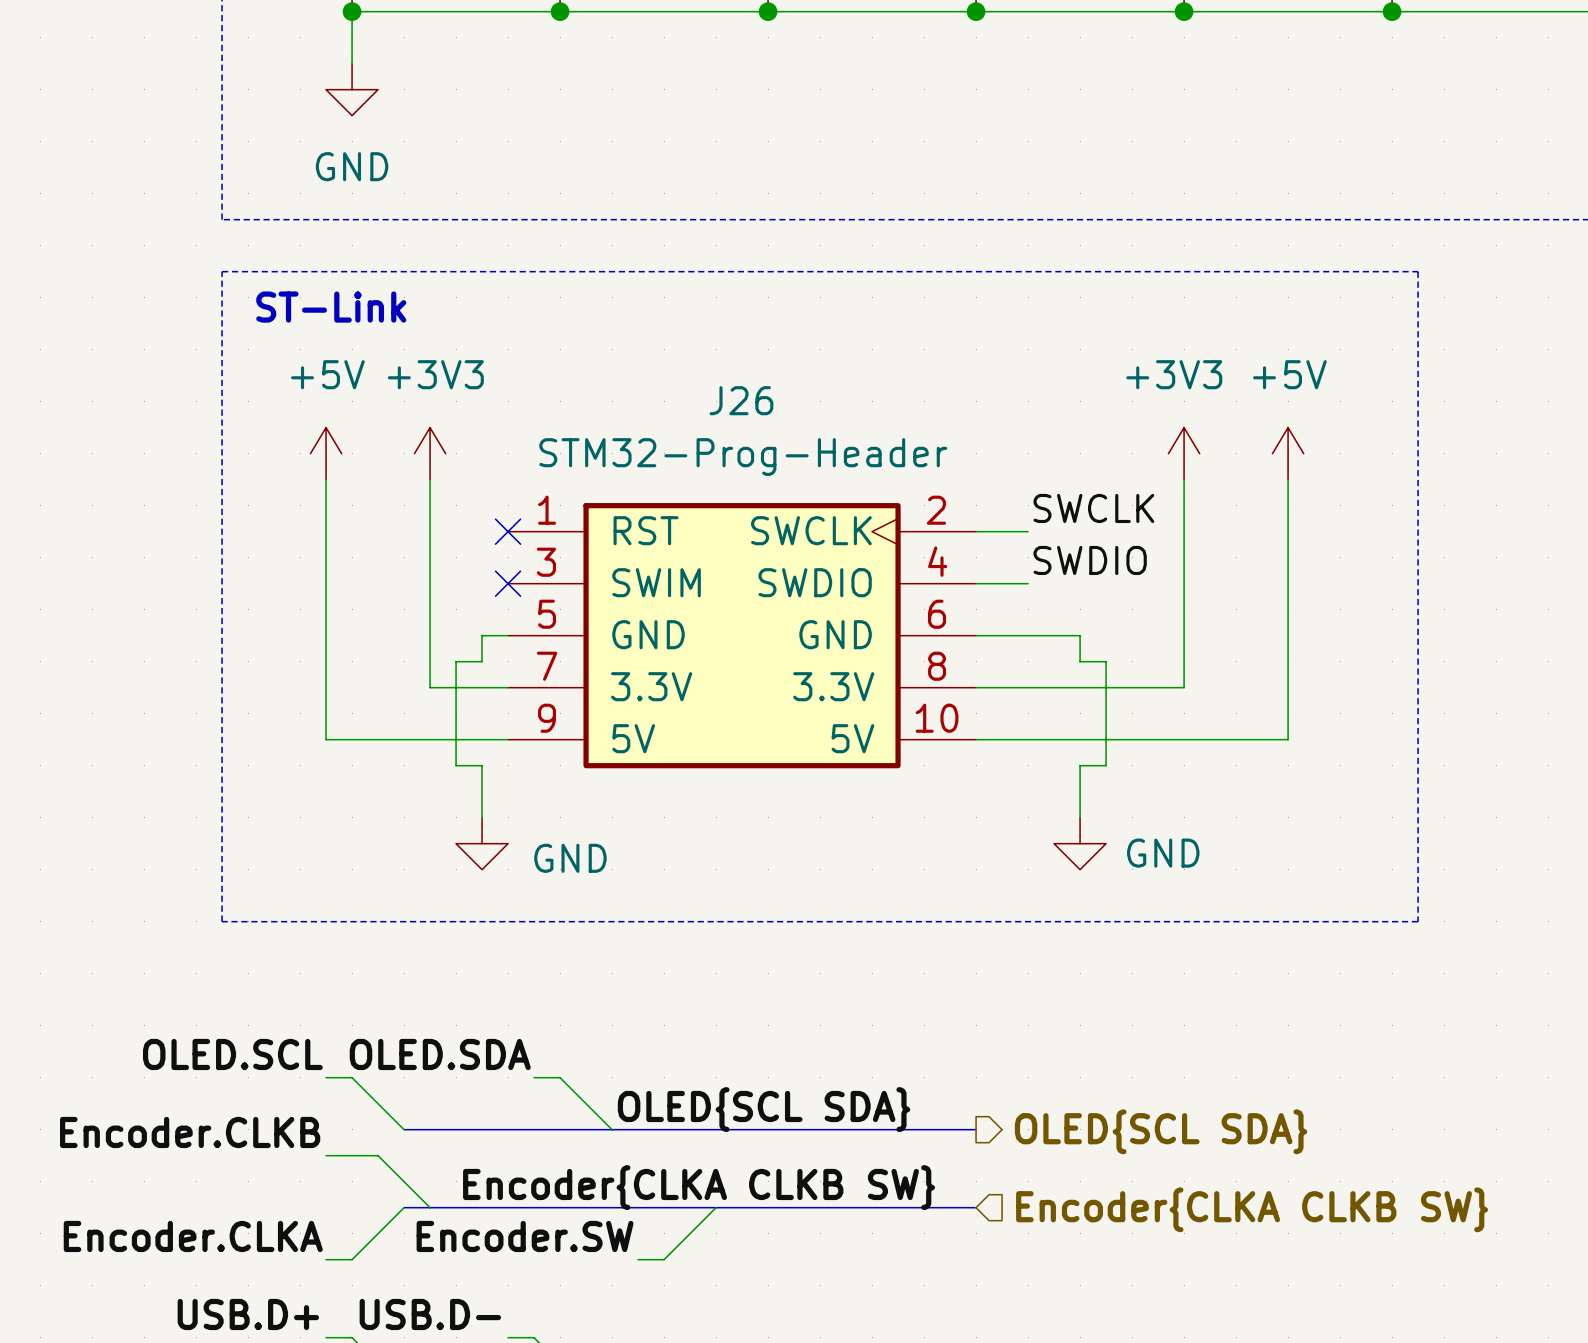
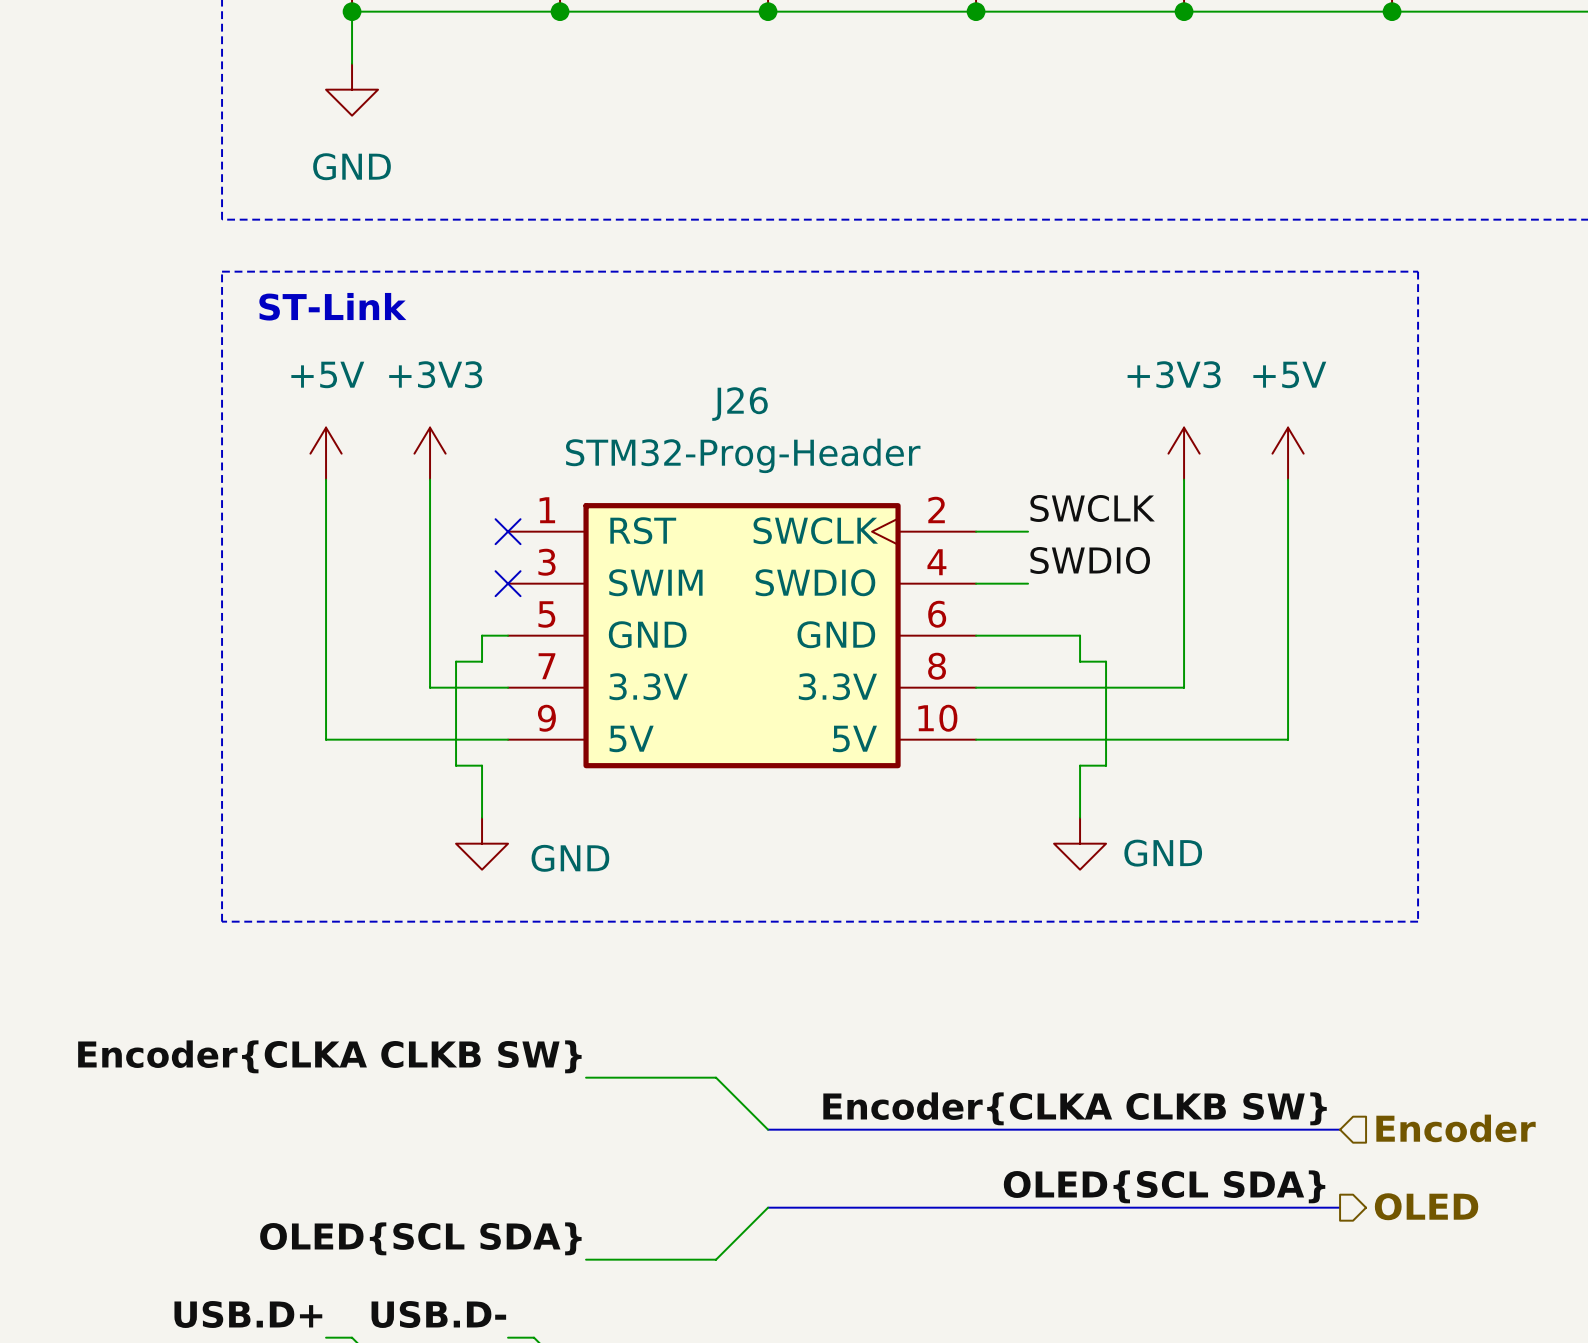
label: OLED.SCL (232, 1054) -> none
label: OLED.SDA (440, 1054) -> none
wire: (326, 1077) (352, 1077) (404, 1129) -> none
wire: (534, 1077) (560, 1077) (612, 1129) -> none
wire: none -> (586, 1077) (716, 1077) (768, 1129)
label position: OLED{SCL SDA} (764, 1109) -> OLED{SCL SDA} (420, 1238)
label: none -> Encoder{CLKA CLKB SW} (1075, 1108)
hierarchical label: none -> Encoder (1456, 1128)
bus: (404, 1129) (768, 1129) -> none
bus: none -> (976, 1129) (1340, 1129)
hierarchical label: OLED{SCL SDA} (1161, 1131) -> none
label: Encoder.CLKB (190, 1132) -> none
wire: (326, 1155) (378, 1155) (430, 1207) -> none
label position: Encoder{CLKA CLKB SW} (699, 1187) -> Encoder{CLKA CLKB SW} (329, 1056)
label: none -> OLED{SCL SDA} (1164, 1186)
hierarchical label: none -> OLED (1426, 1206)
wire: (404, 1207) (352, 1259) (326, 1259) -> none
bus: (404, 1207) (768, 1207) -> none
wire: (716, 1207) (664, 1259) -> (768, 1207) (716, 1259) (664, 1259)
bus: none -> (976, 1207) (1340, 1207)
hierarchical label: Encoder{CLKA CLKB SW} (1252, 1209) -> none
label: Encoder.CLKA (193, 1236) -> none
label: Encoder.SW (525, 1236) -> none
wire: none -> (586, 1259) (638, 1259)

